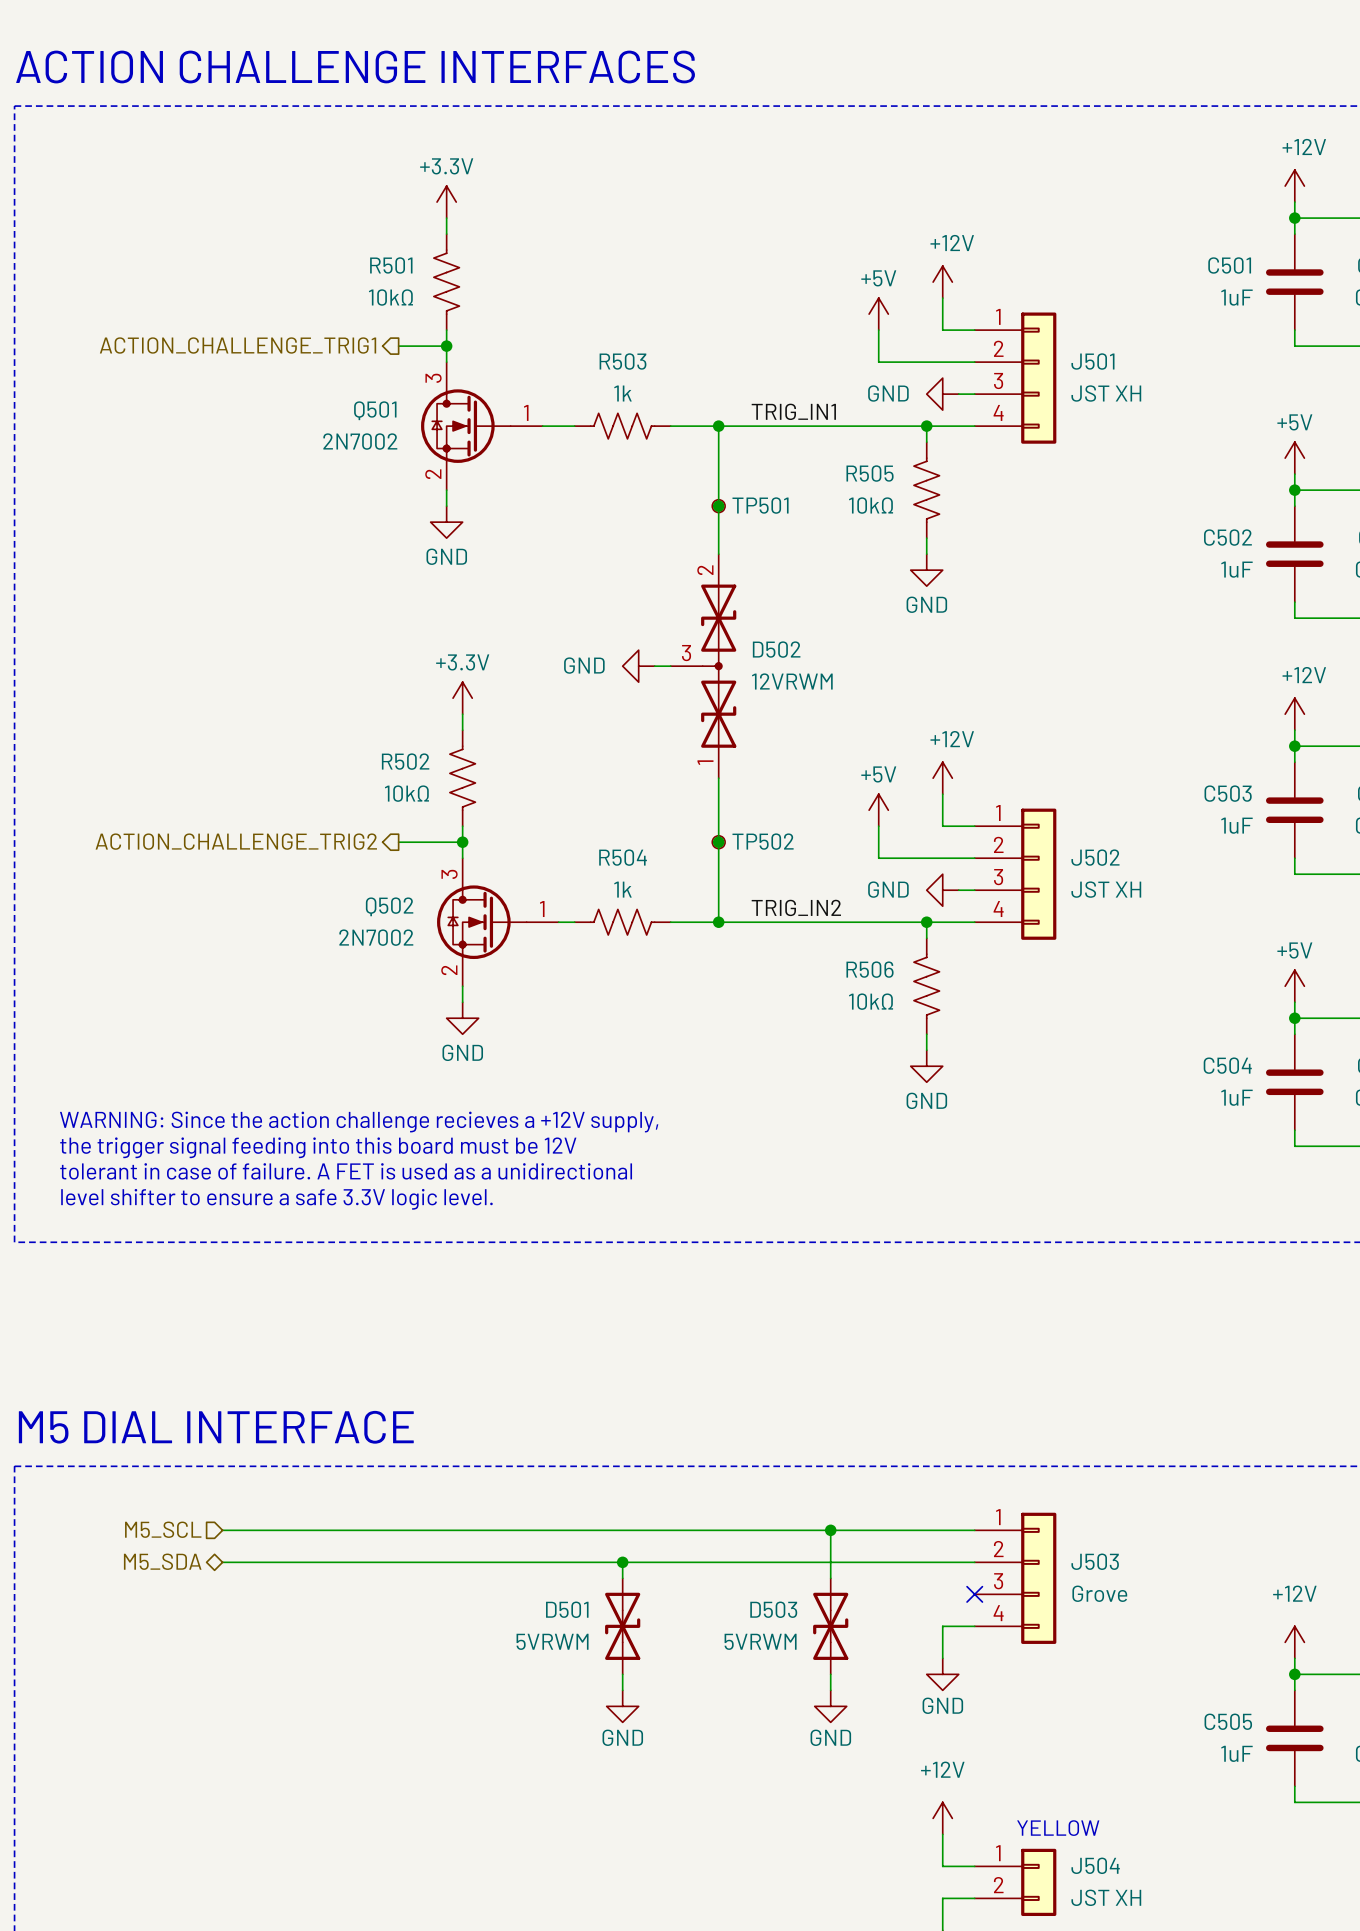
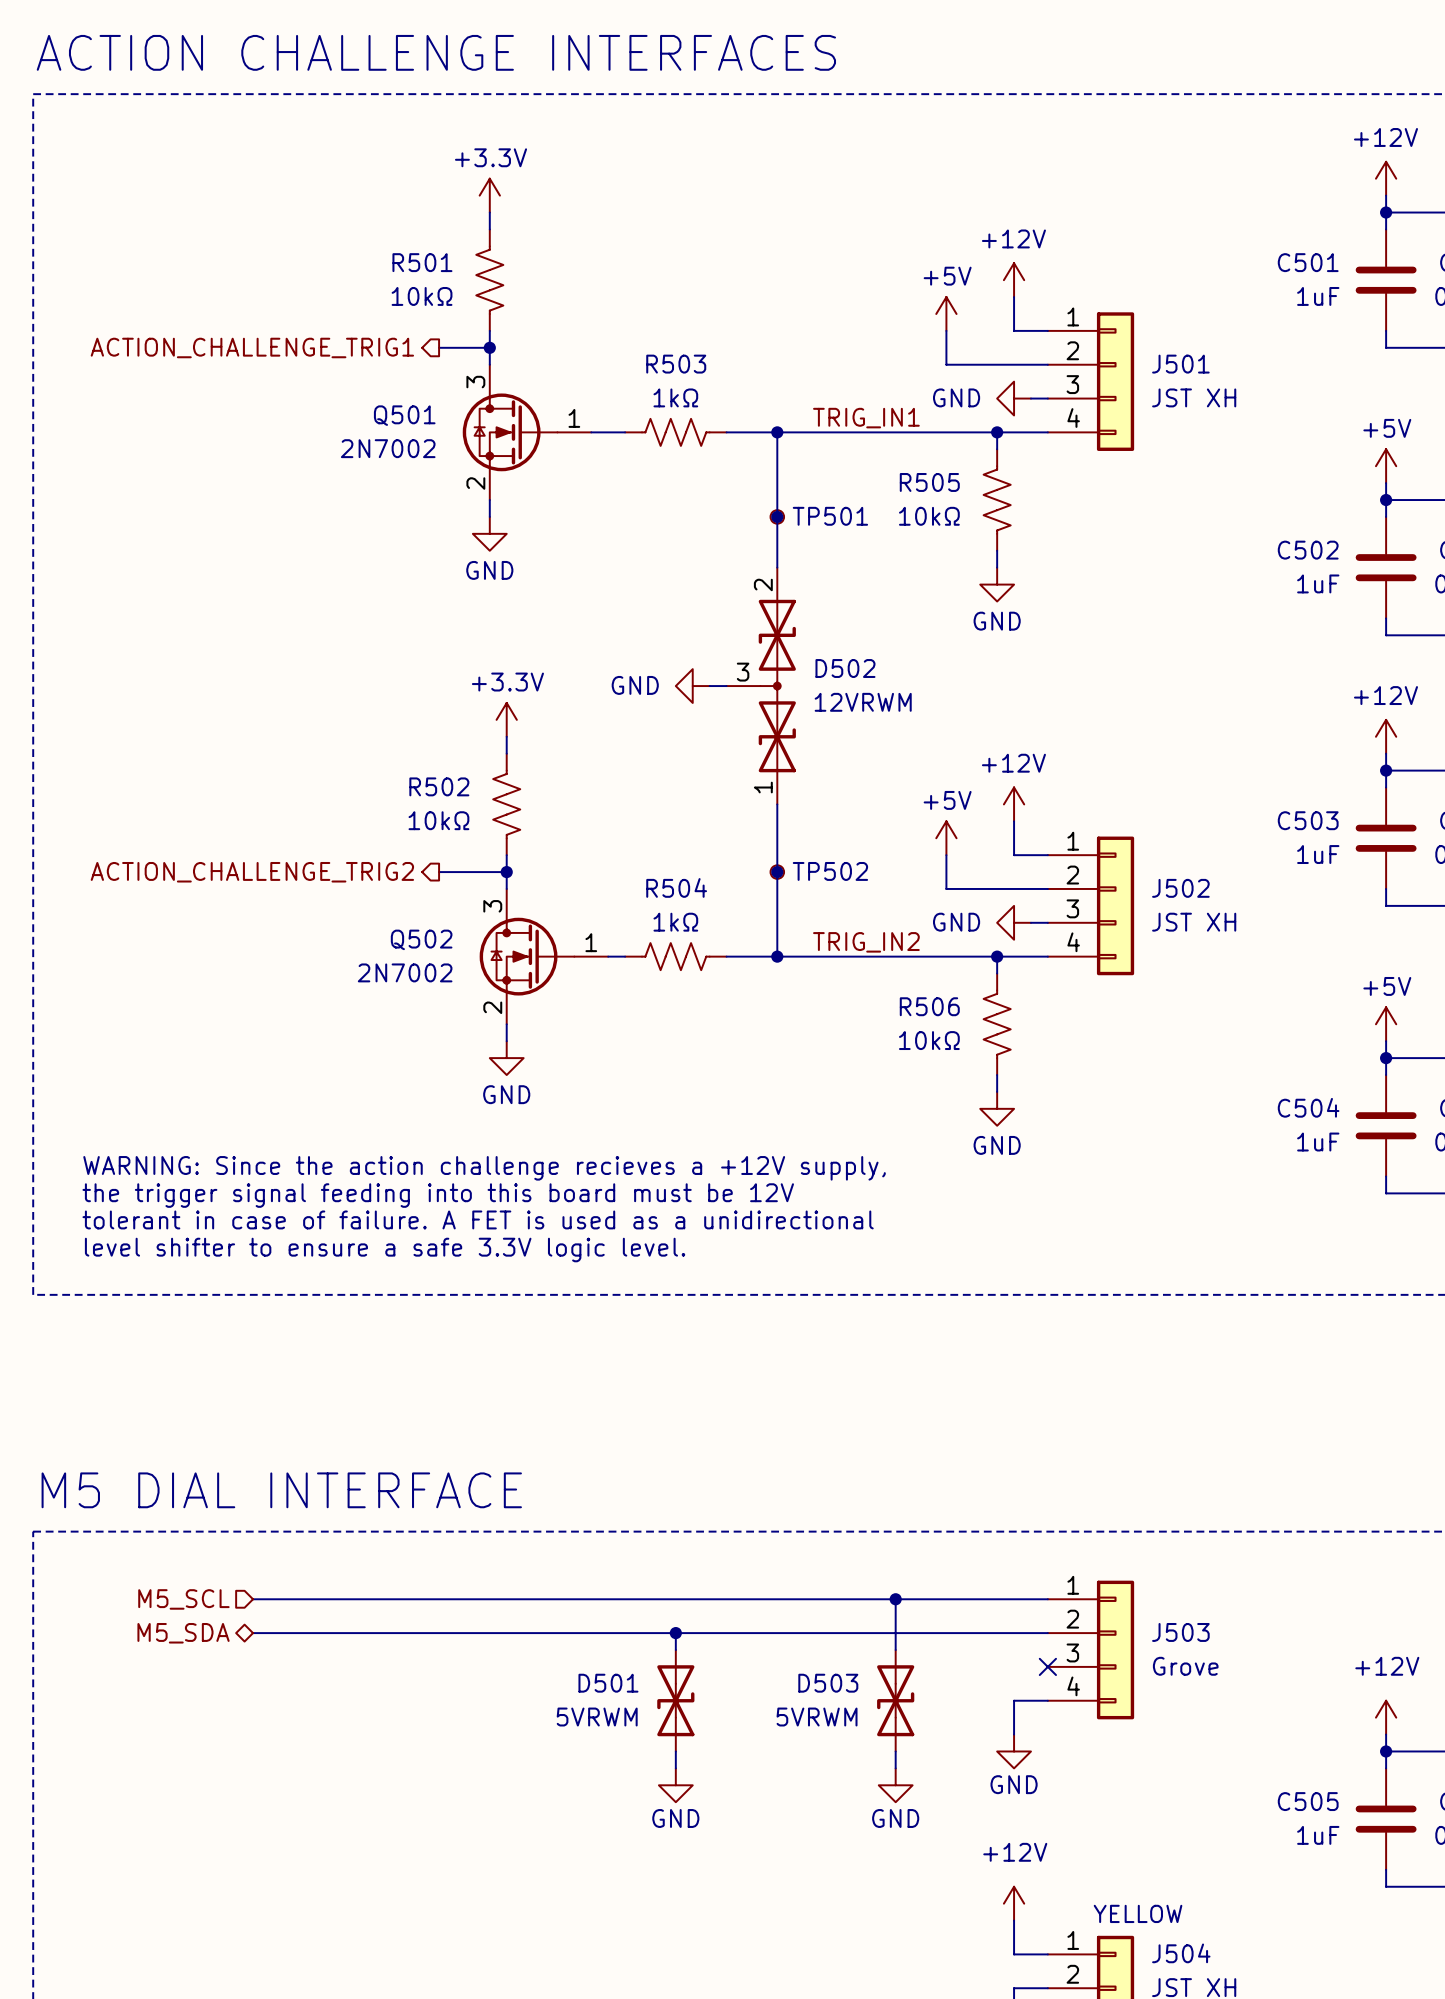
R503 value: 1k (622, 393) -> 1kΩ (675, 397)
R504 value: 1k (622, 889) -> 1kΩ (675, 922)

